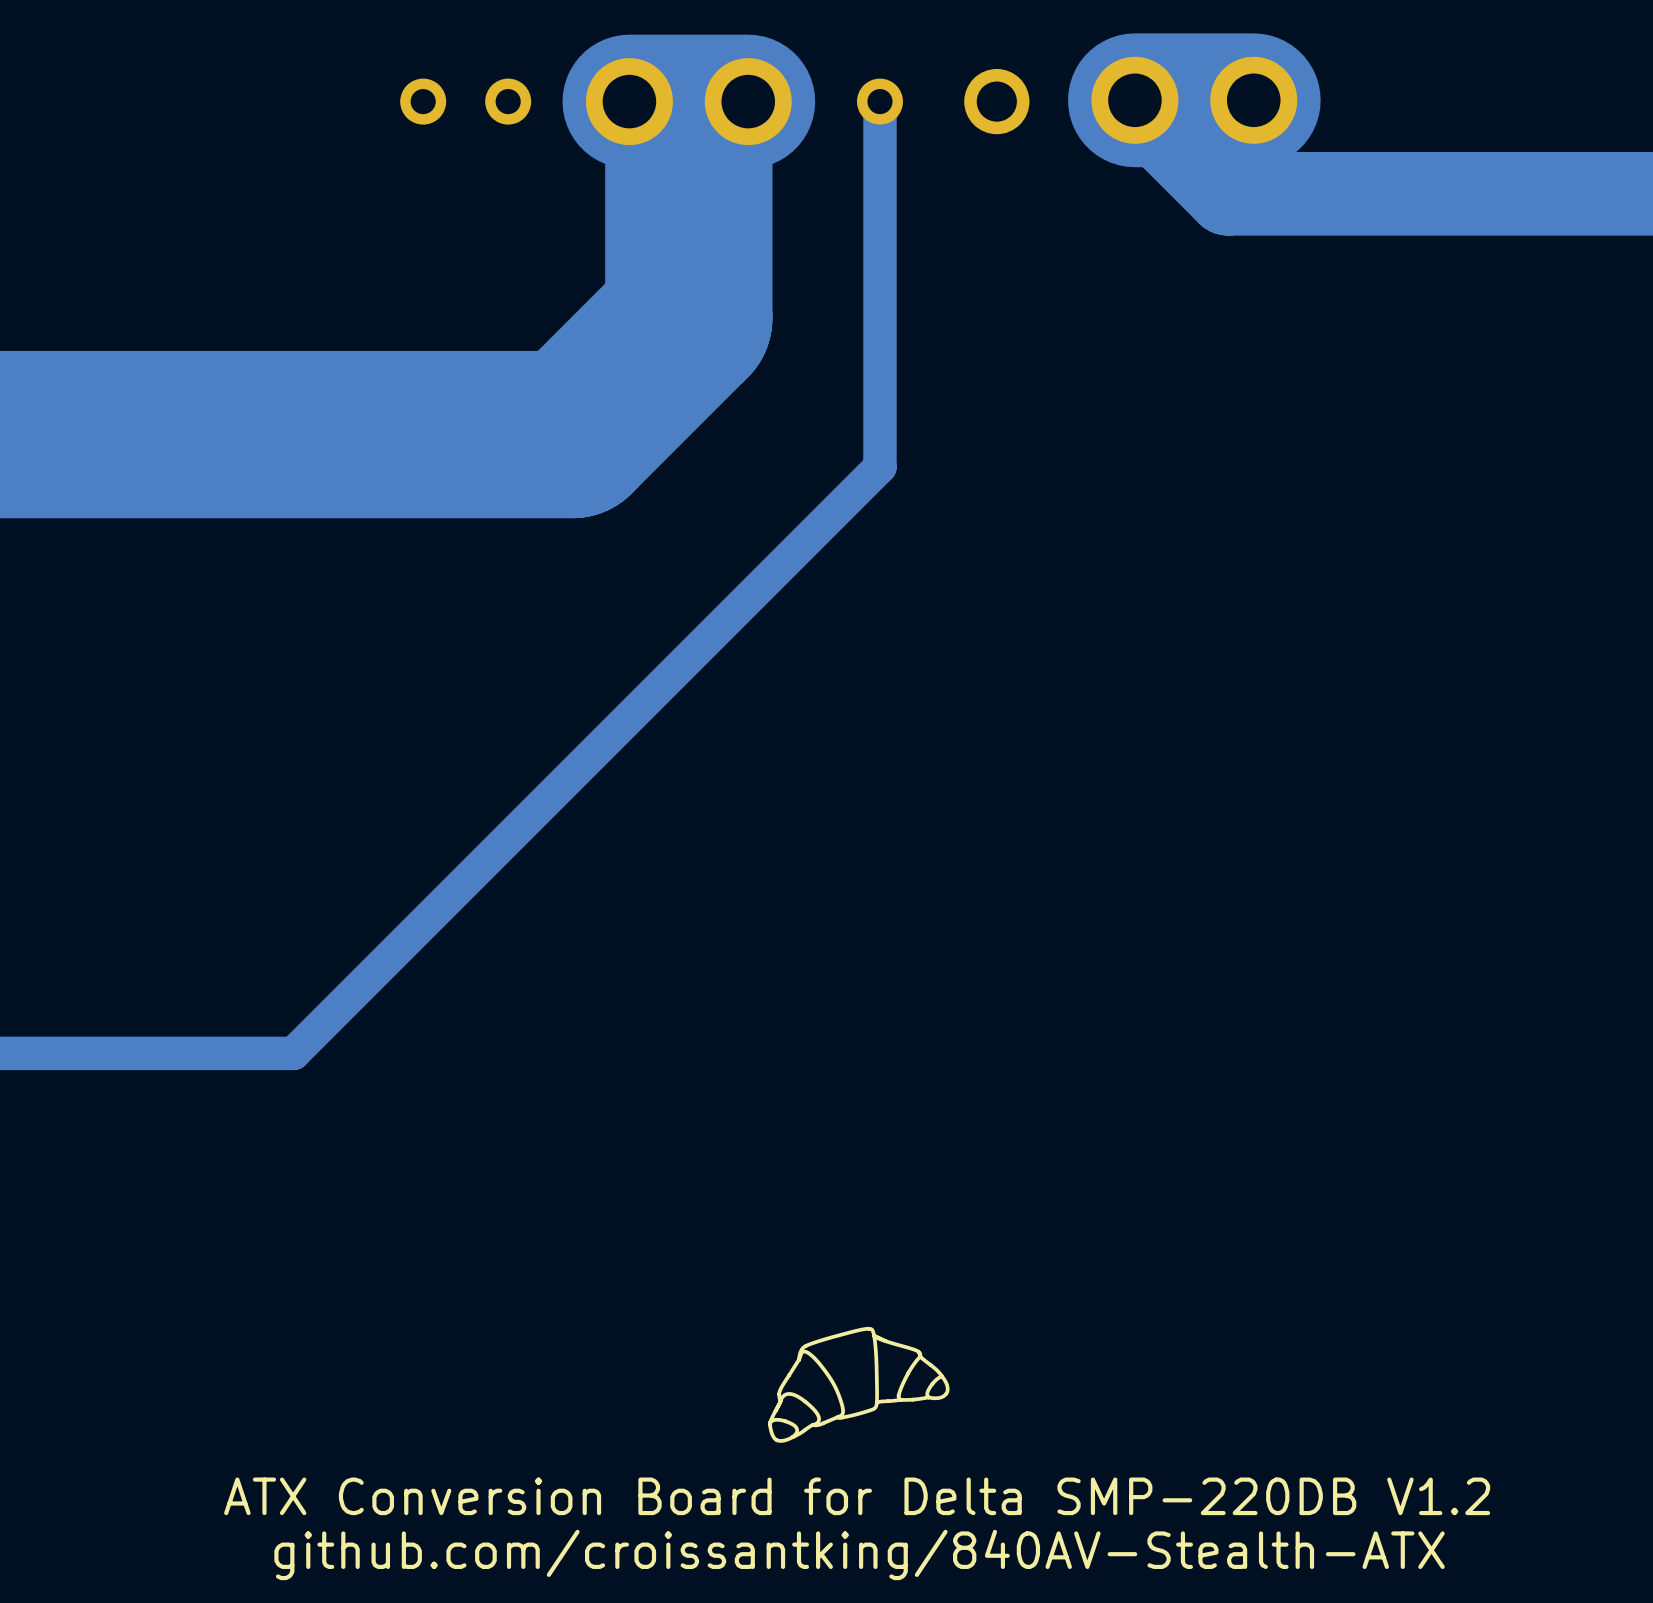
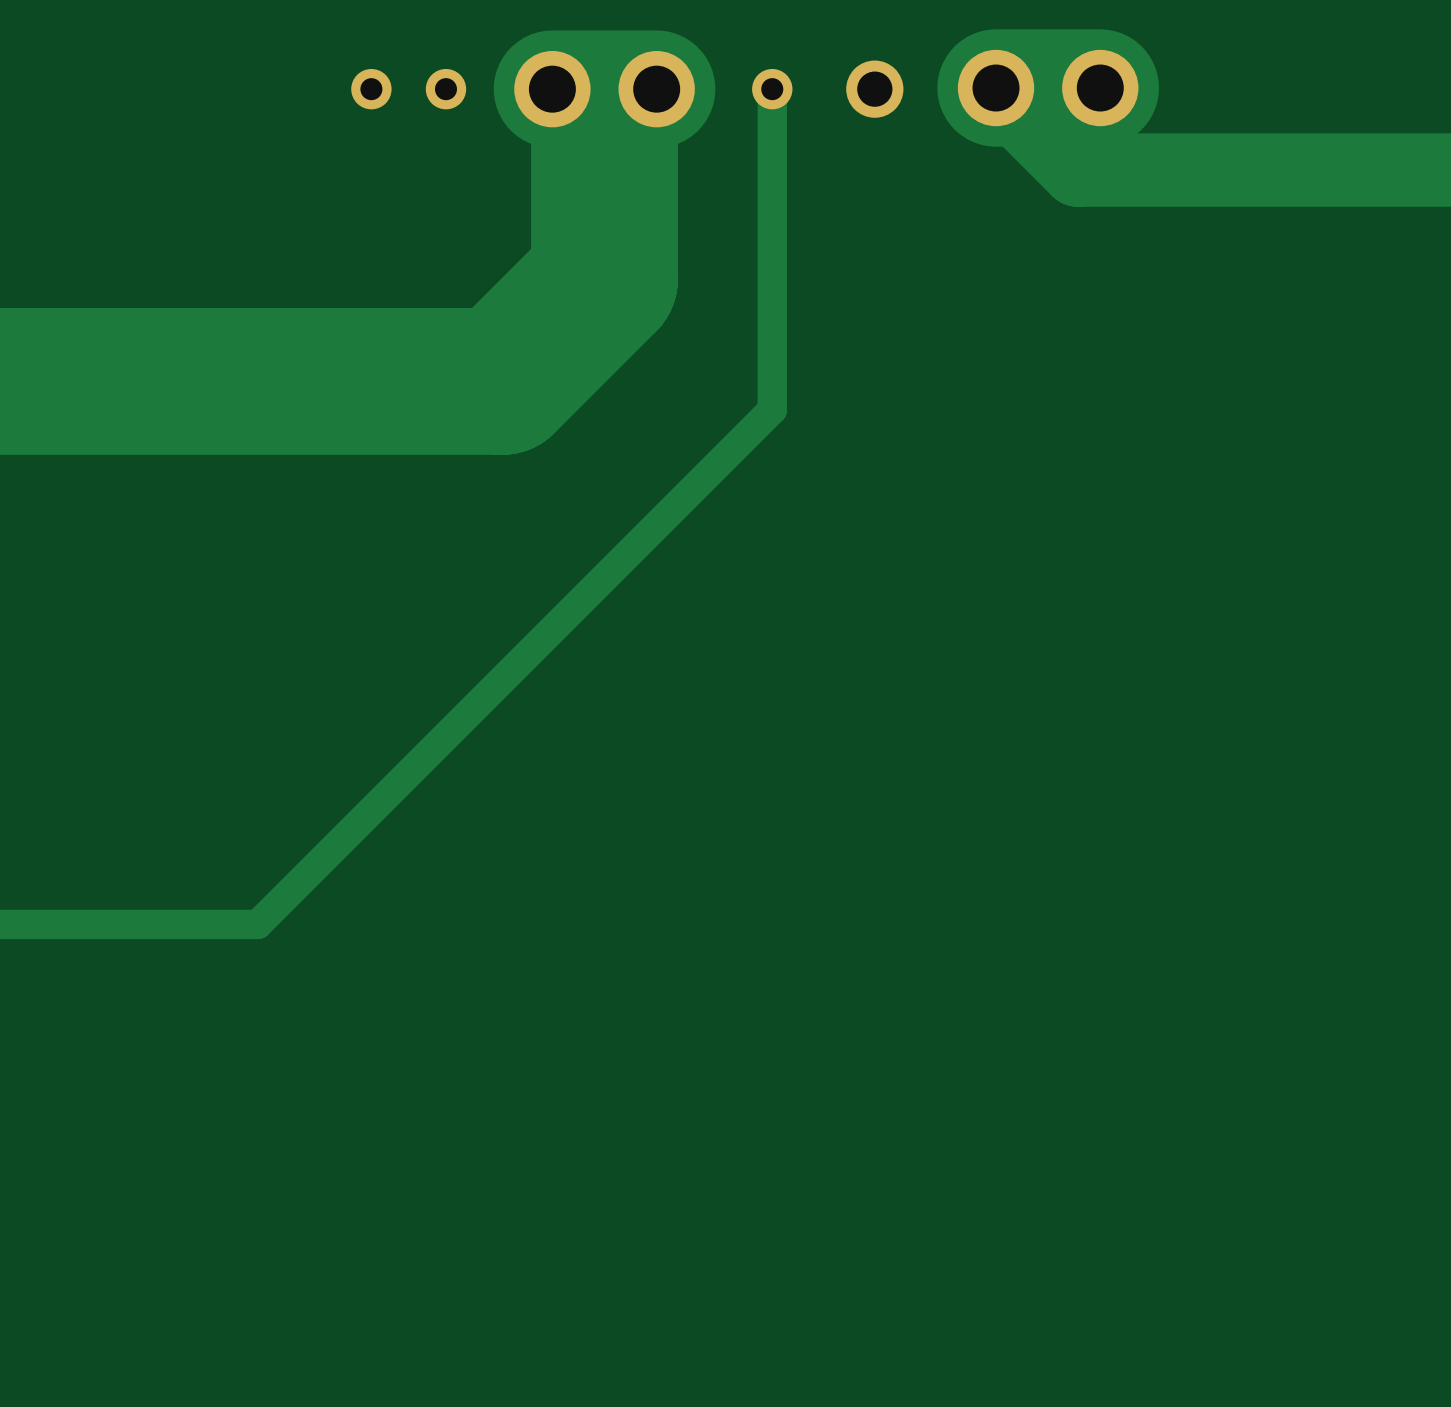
drawing: [767, 1326, 950, 1443] -> none
text: ATX Conversion Board for Delta SMP-220DB V1.2 (857, 1496) -> none
text: github.com/croissantking/840AV-Stealth-ATX (859, 1554) -> none

